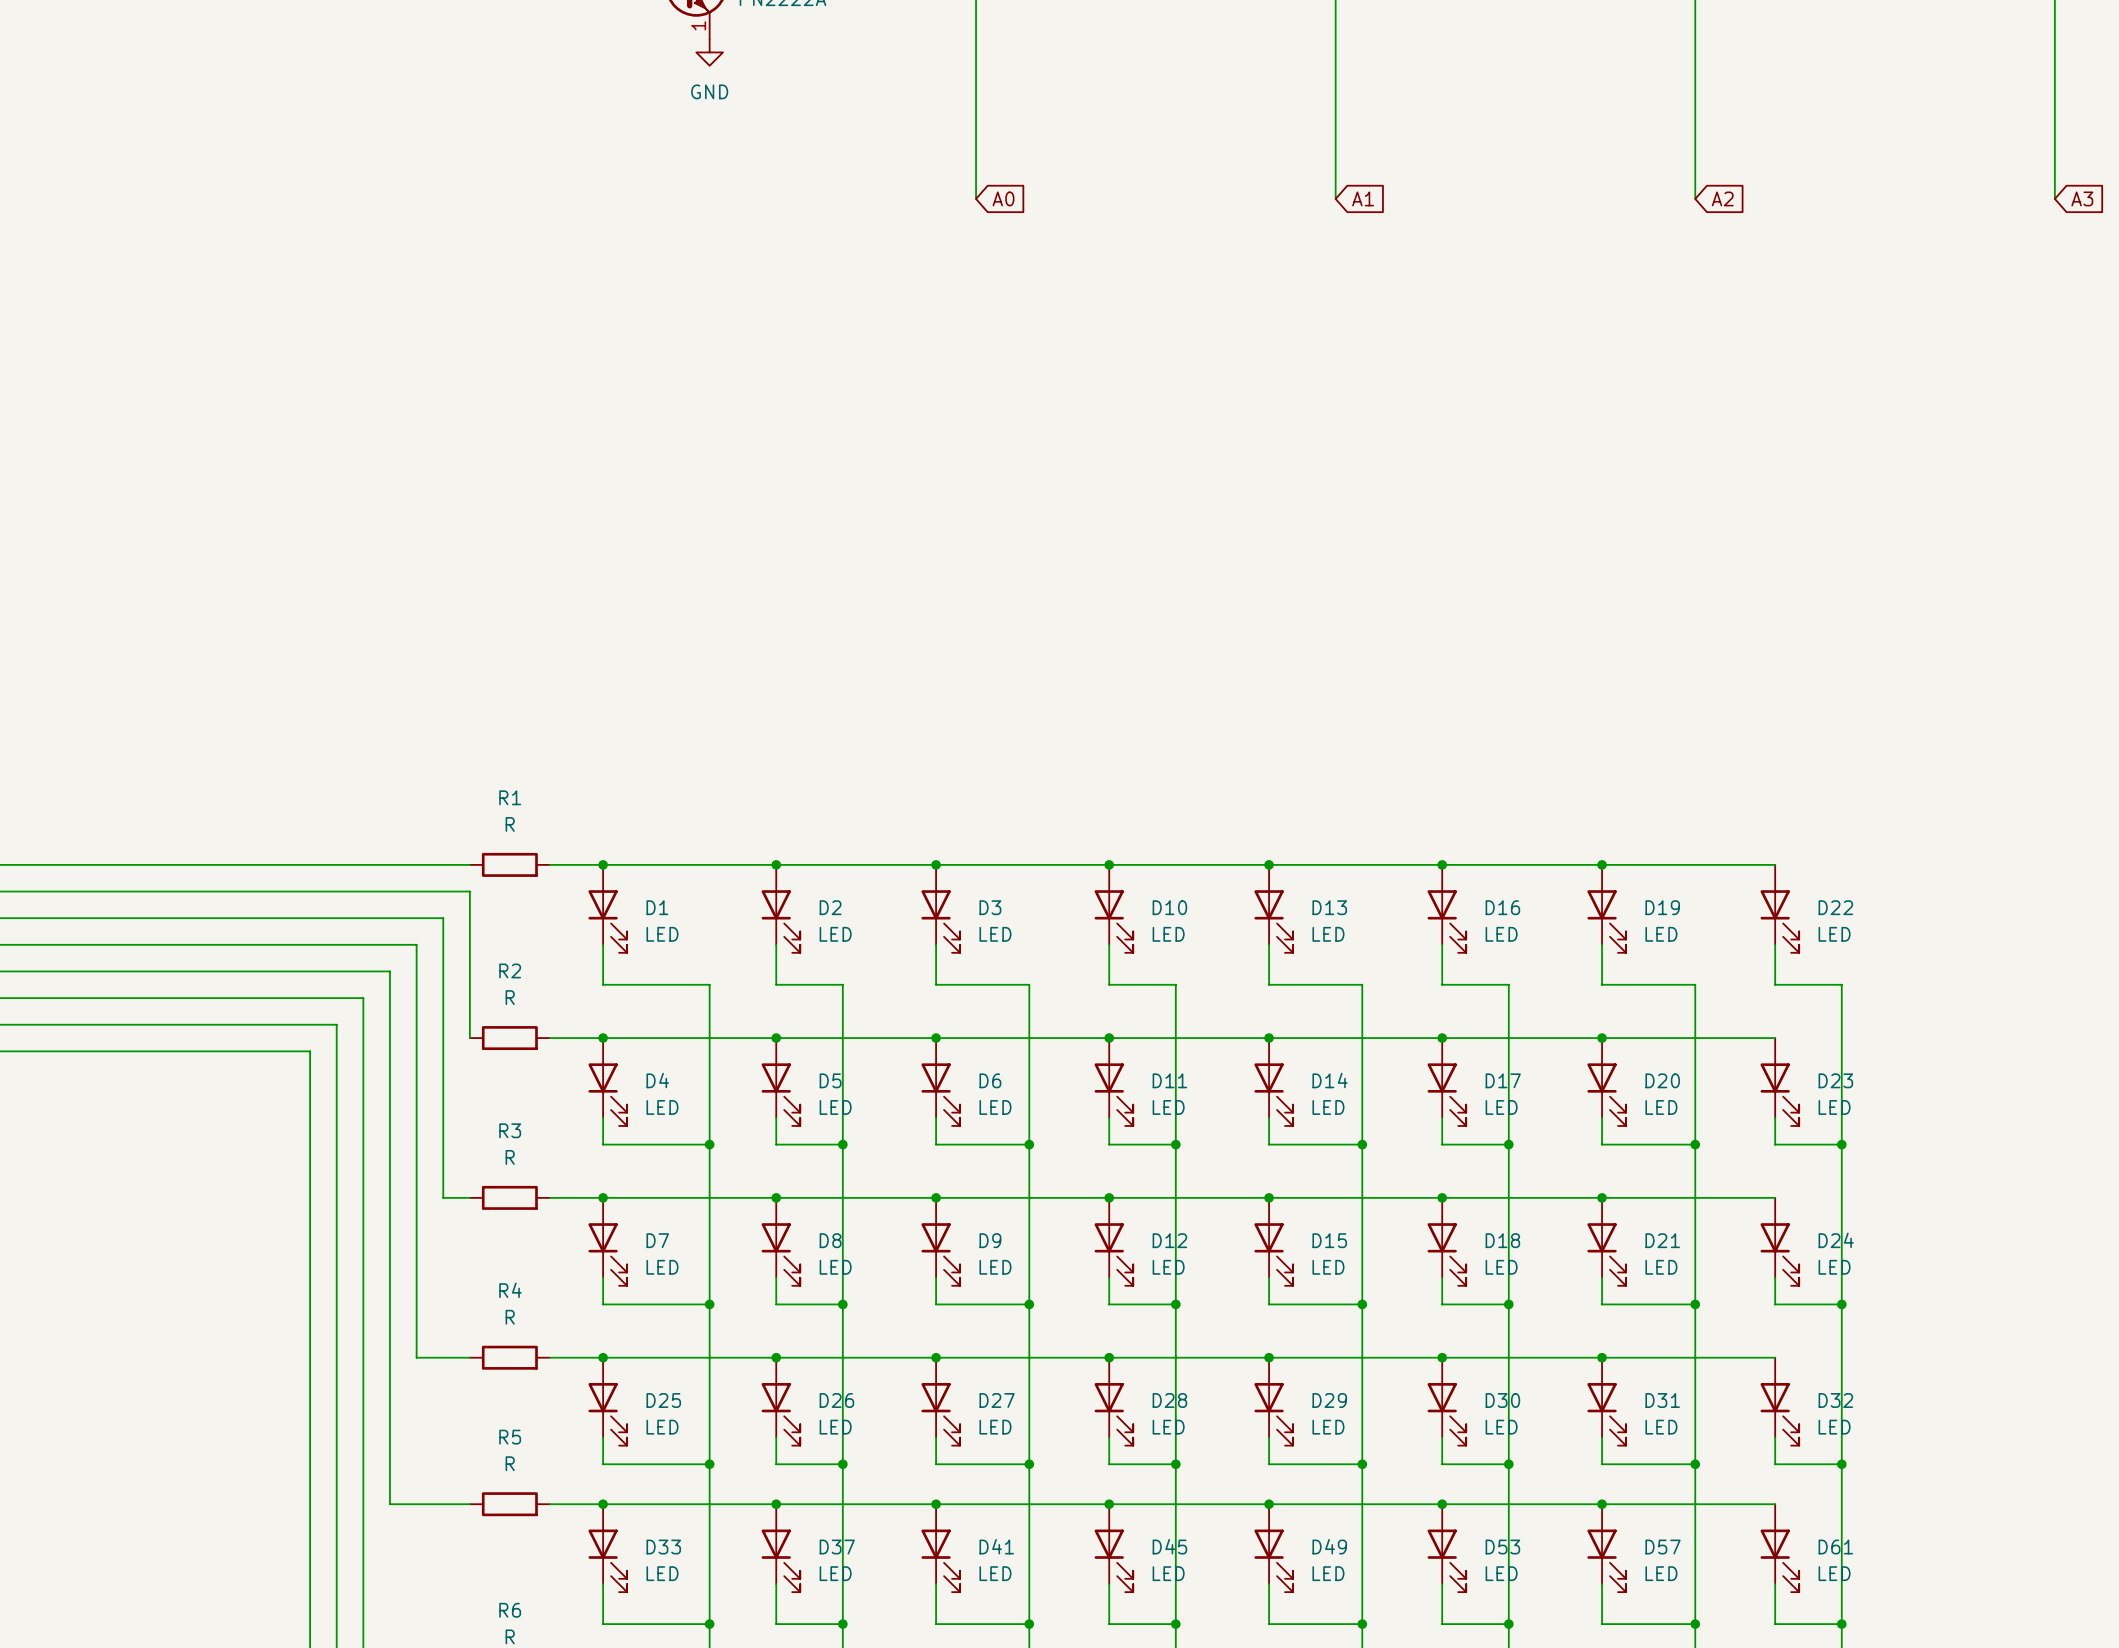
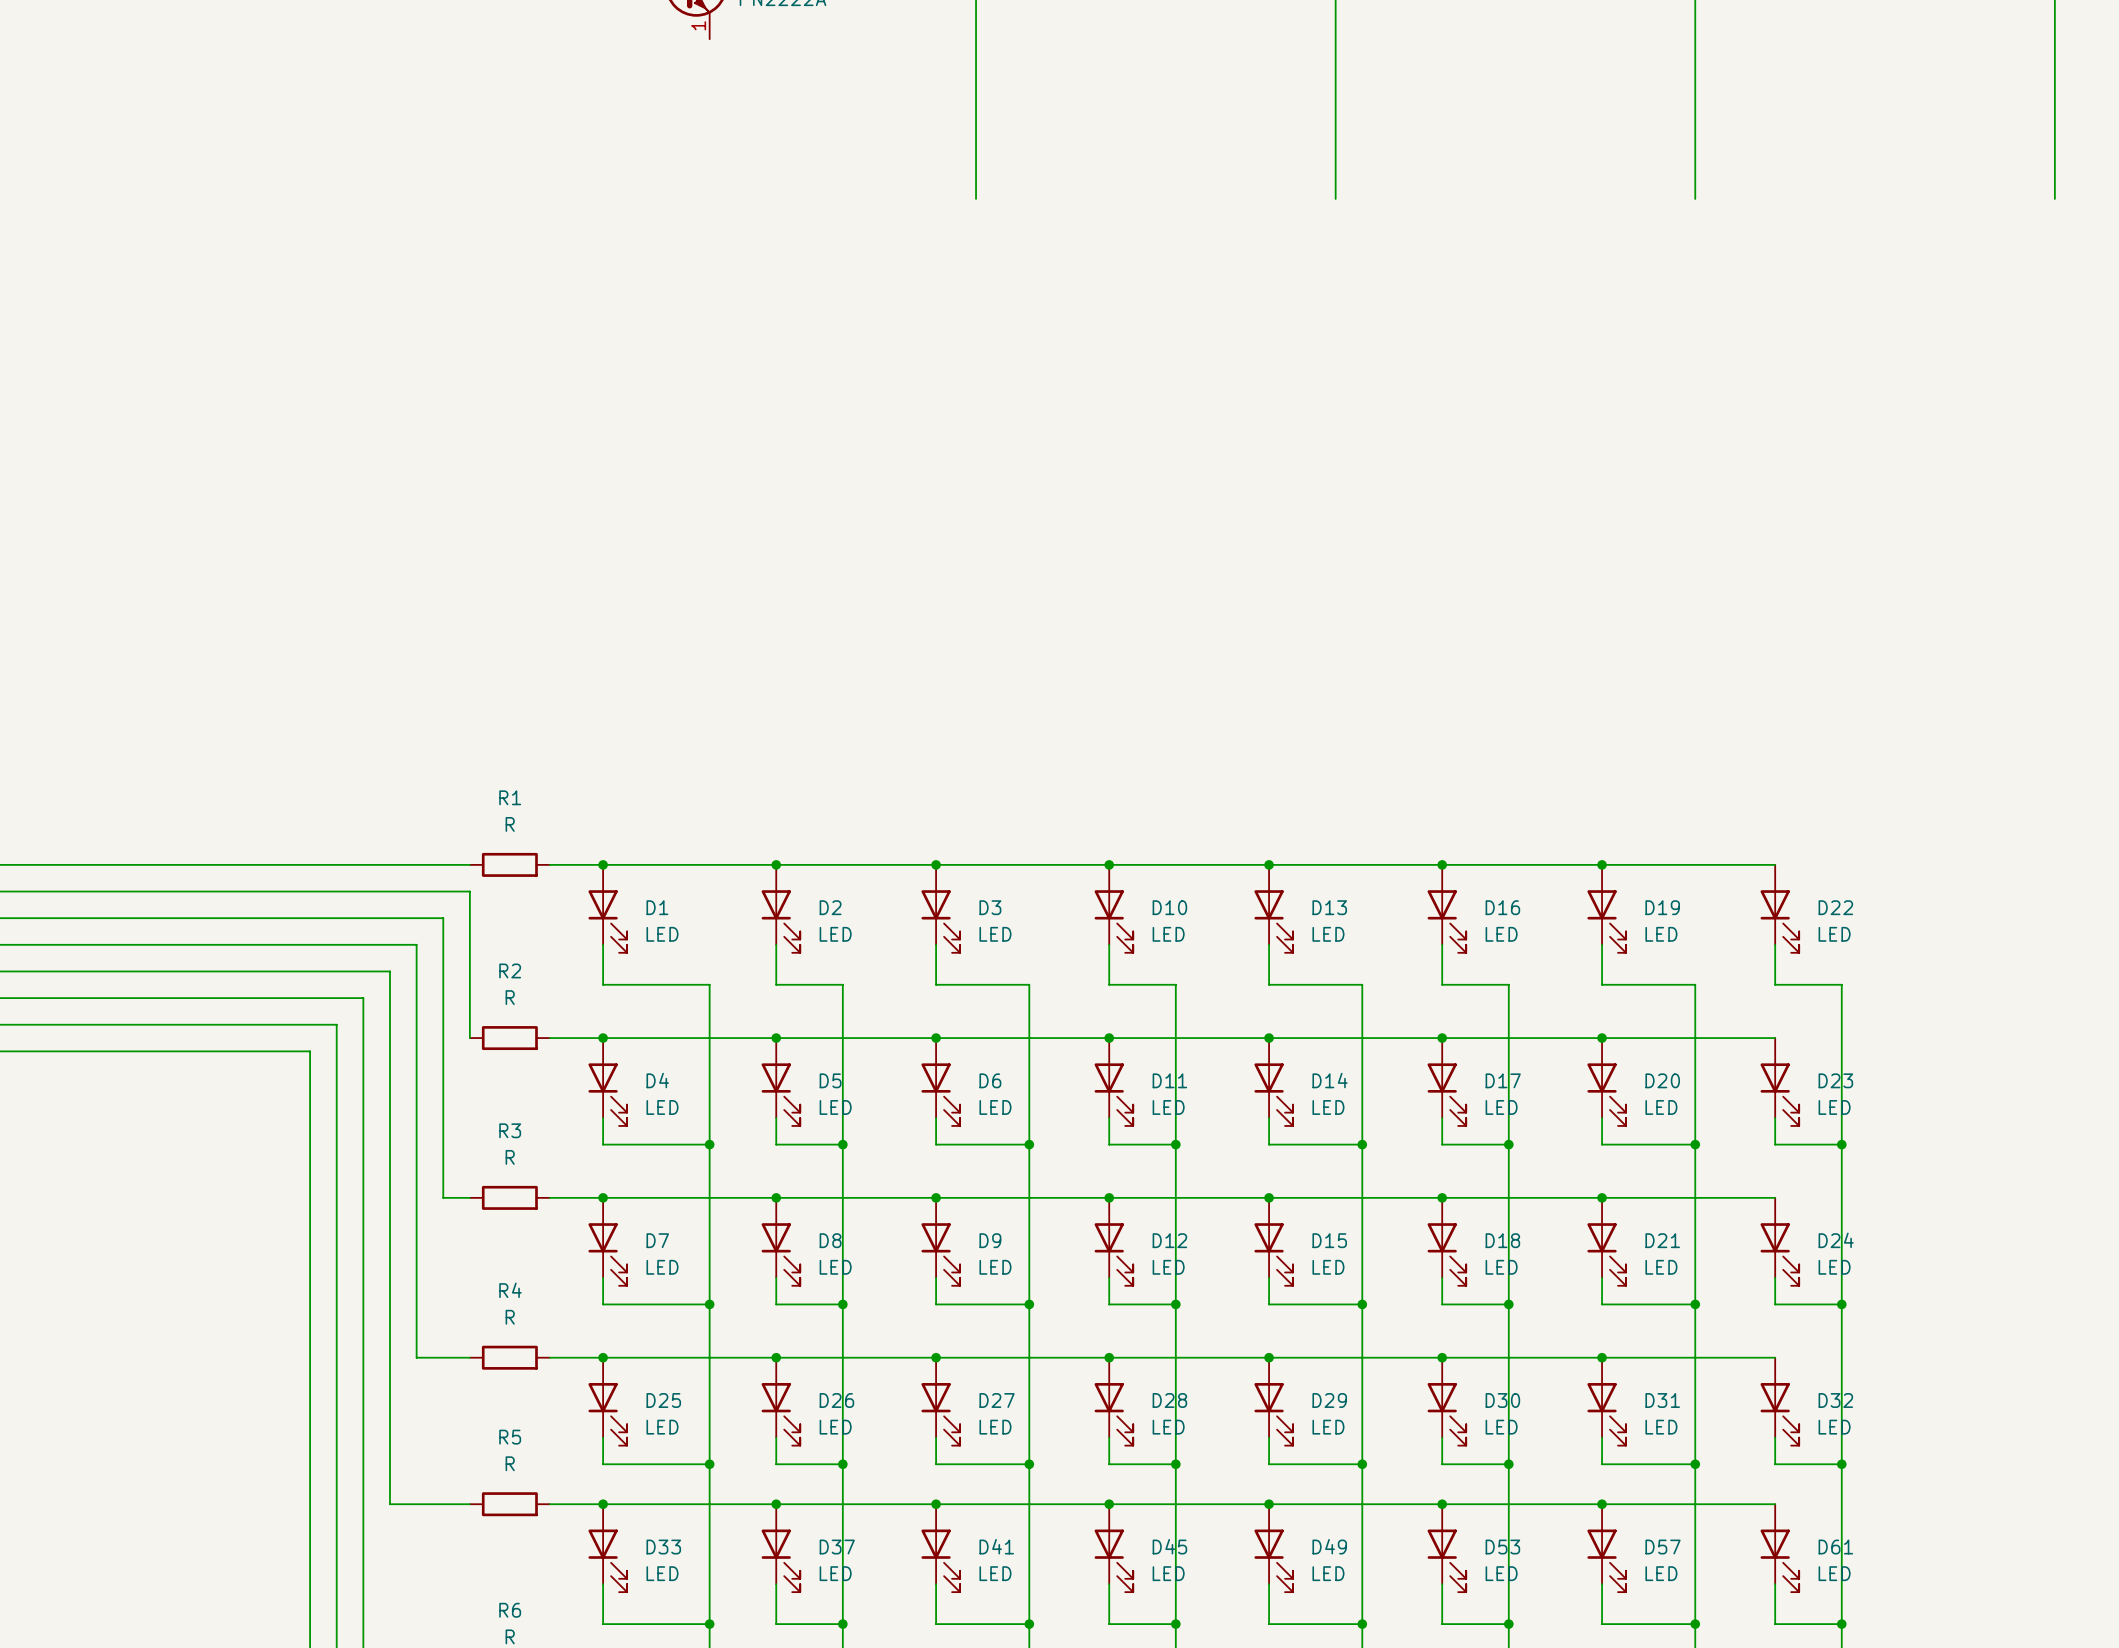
power symbol: GND (709, 52) -> none
global label: A0 (1003, 198) -> none
global label: A1 (1363, 198) -> none
global label: A2 (1722, 198) -> none
global label: A3 (2082, 198) -> none

